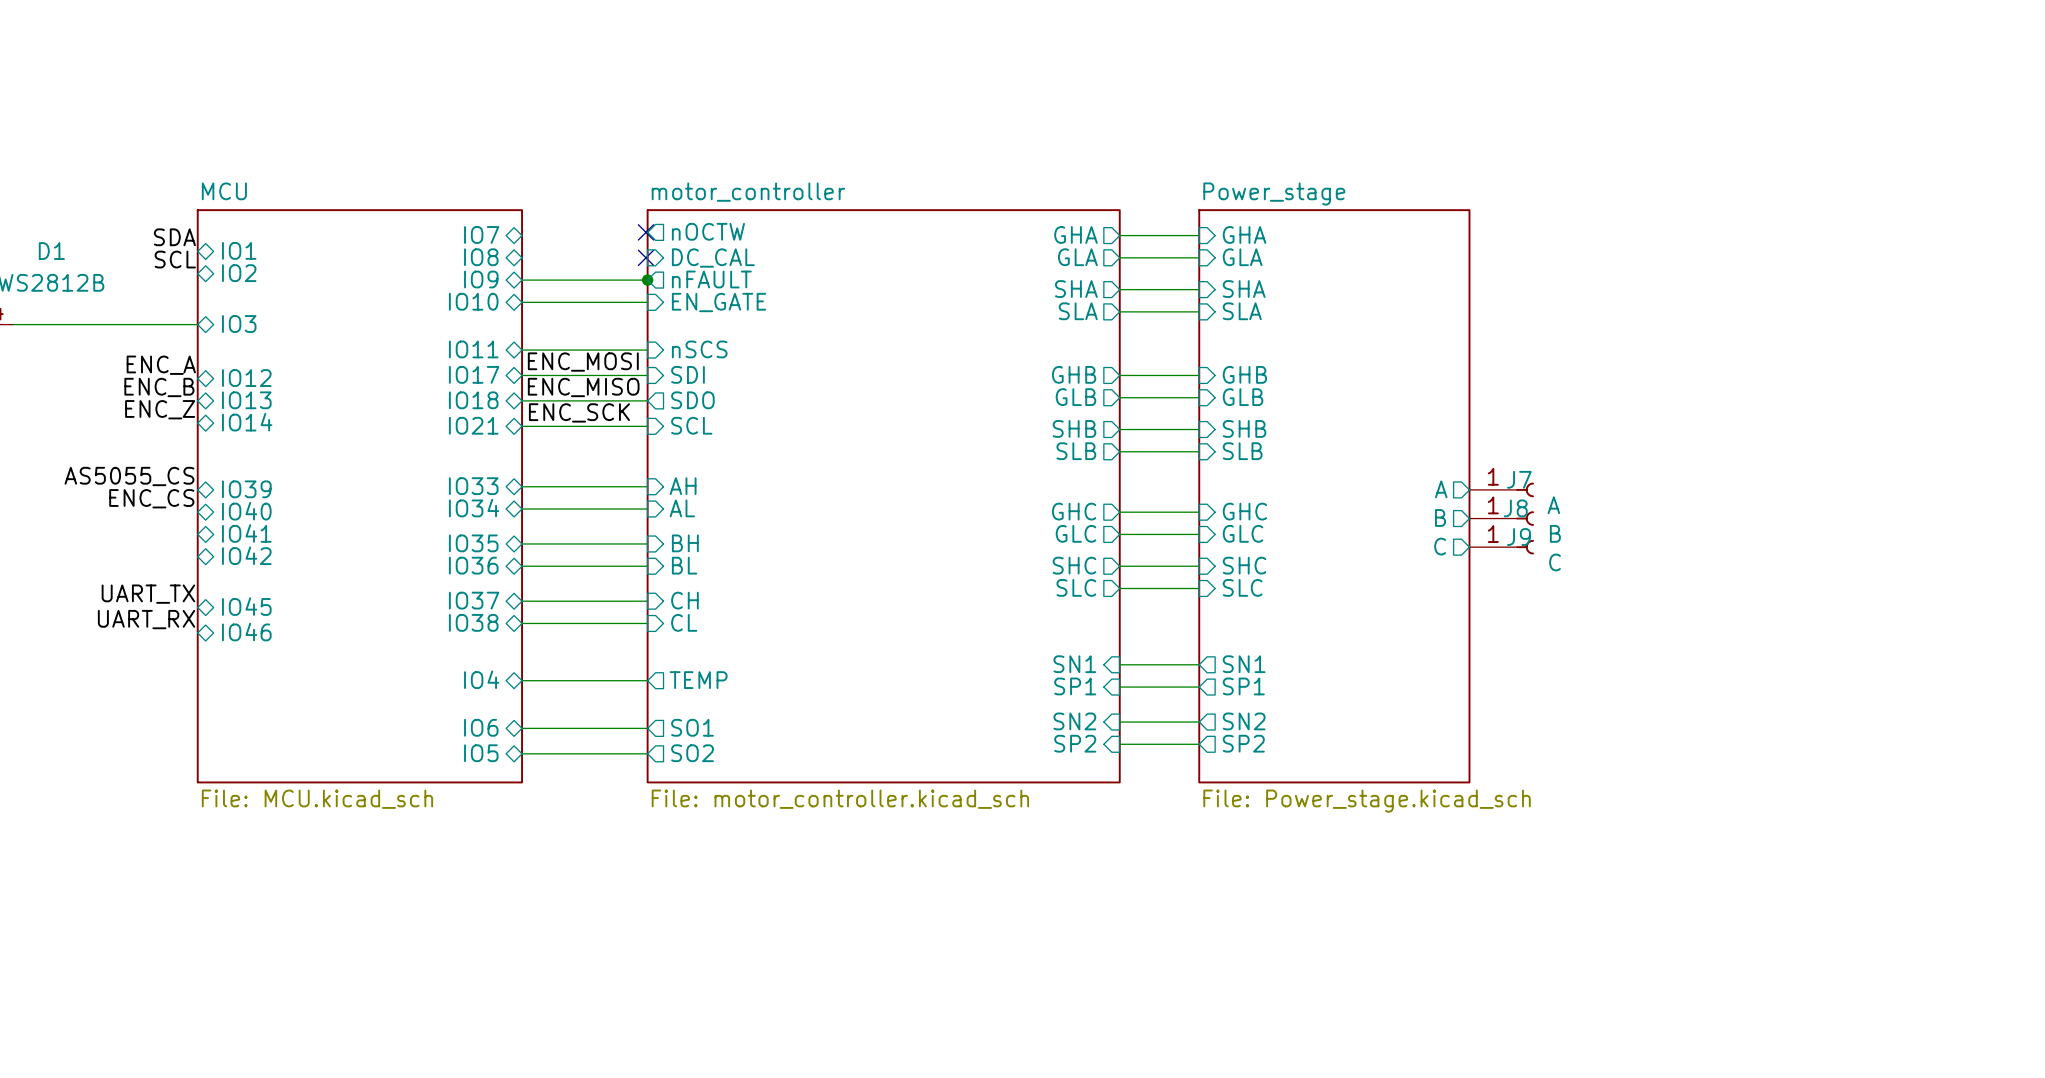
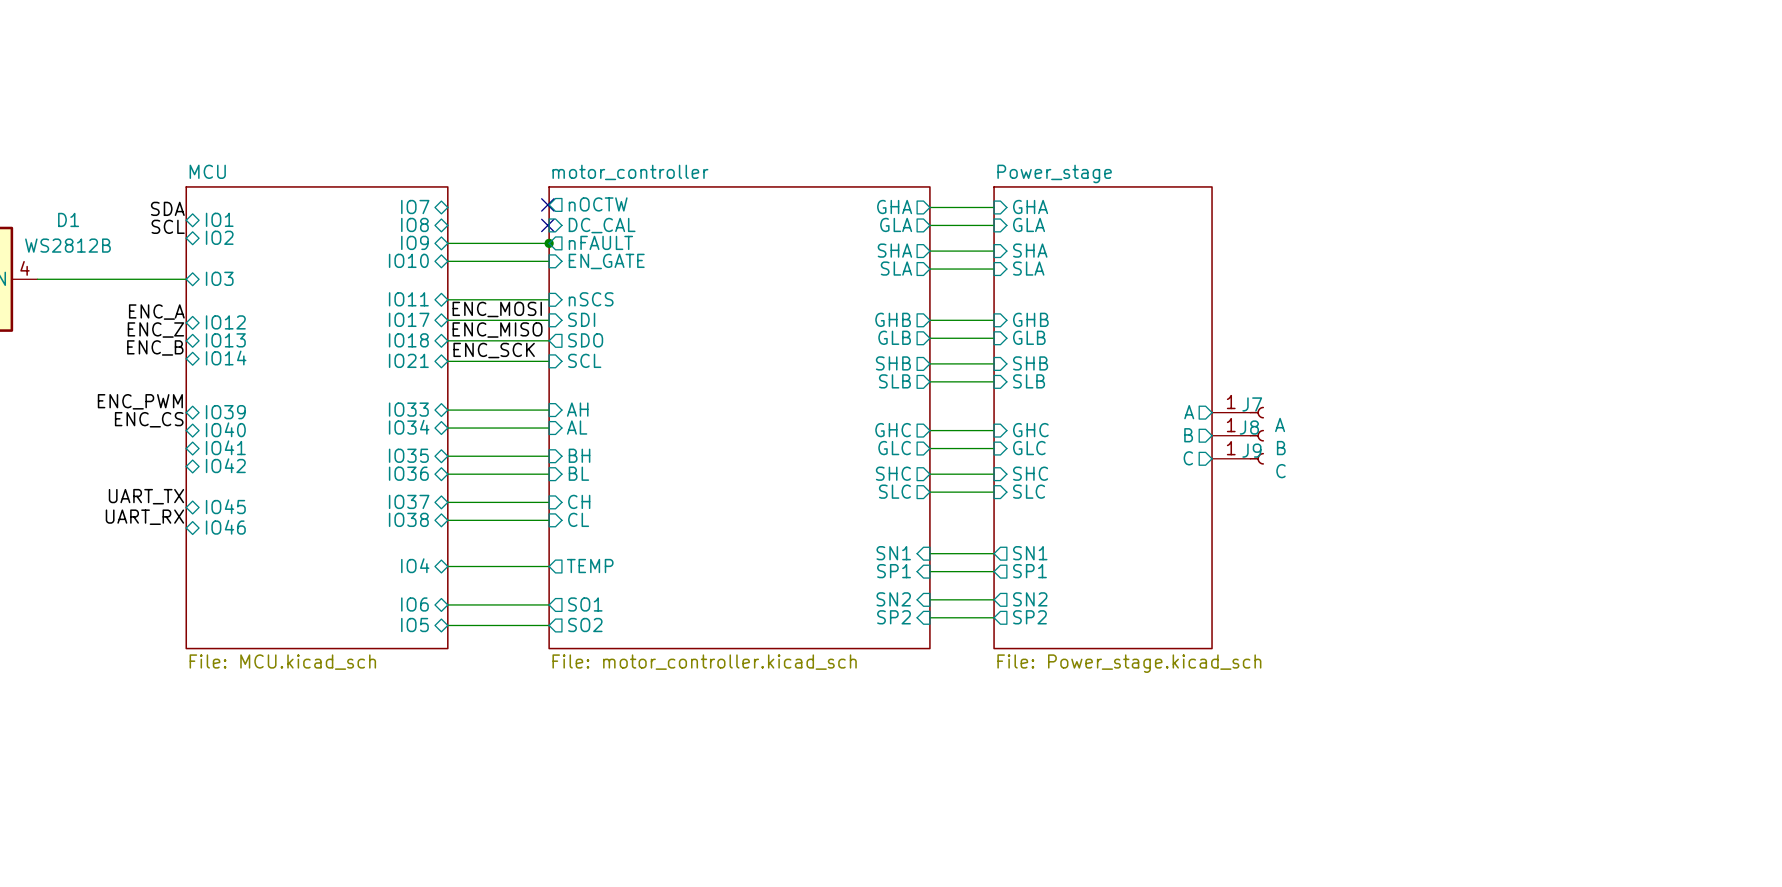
label: ENC_B (159, 387) -> ENC_Z (155, 330)
label: ENC_Z (160, 409) -> ENC_B (155, 347)
label: AS5055_CS (129, 476) -> ENC_PWM (140, 401)

